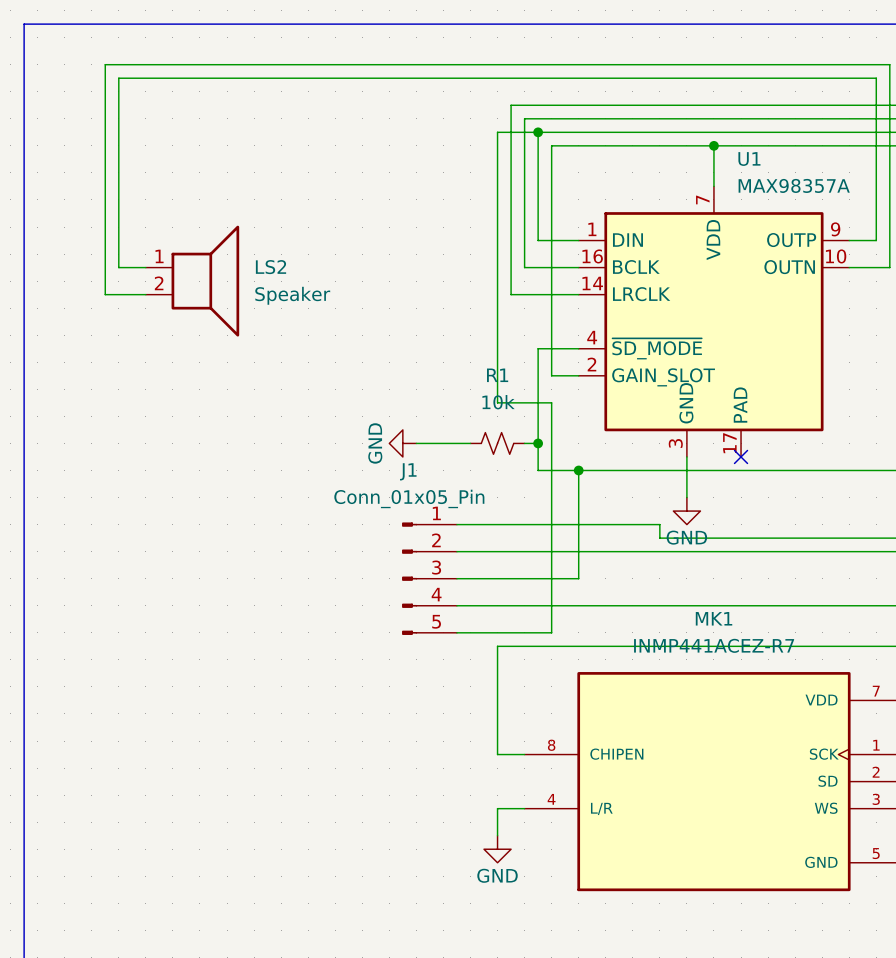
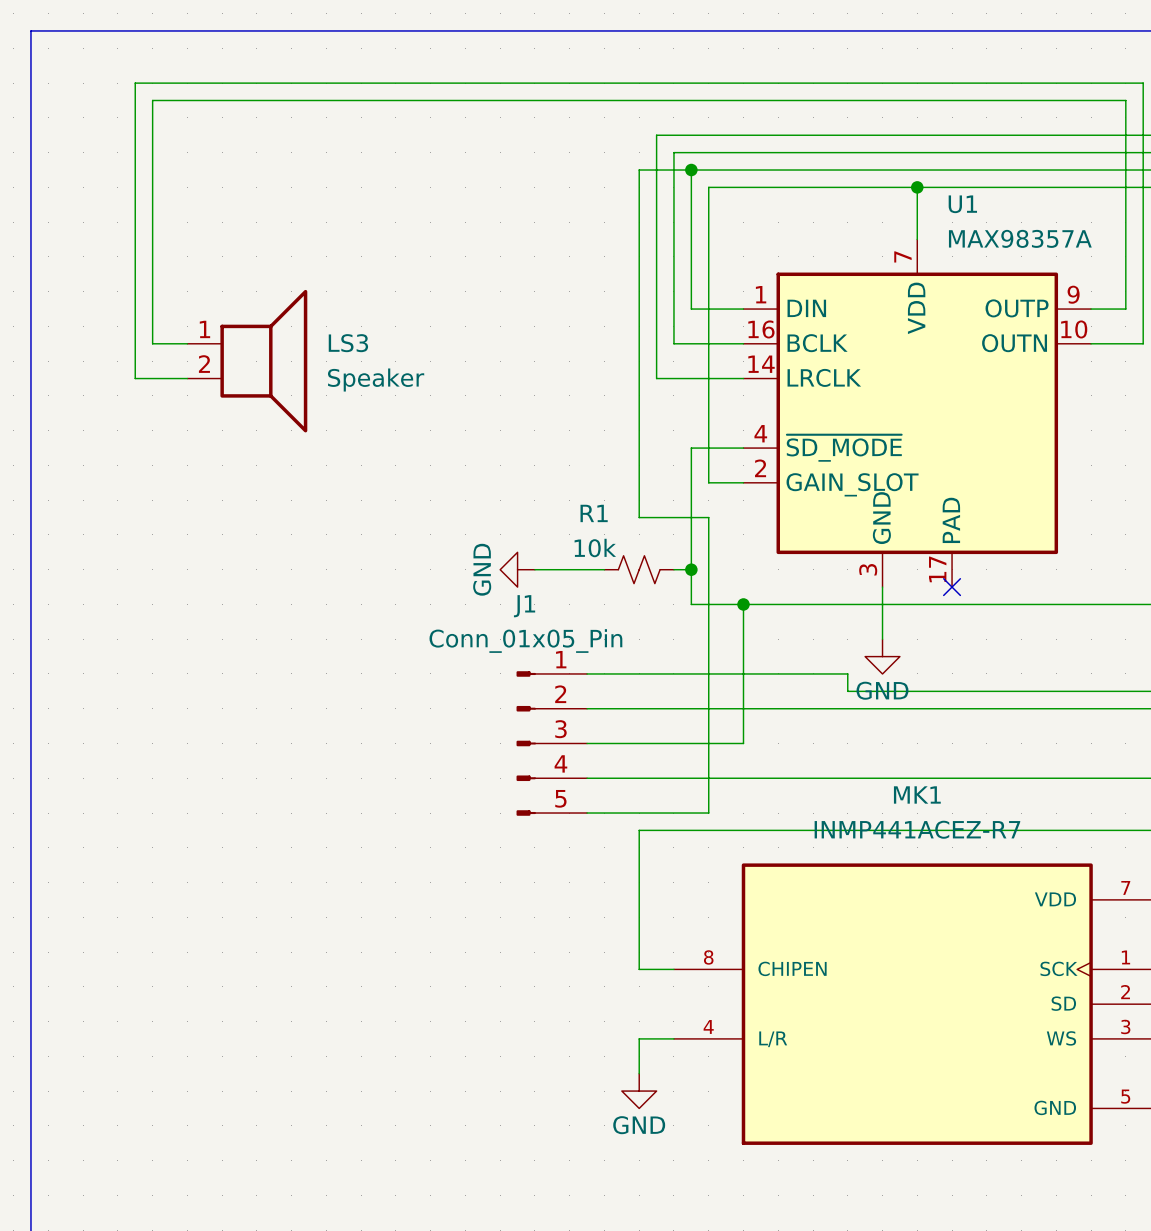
LS2 name: LS2 (271, 267) -> LS3 (348, 343)
R1 name position: R1 (497, 375) -> R1 (594, 513)
R1 value position: 10k (498, 402) -> 10k (595, 548)

